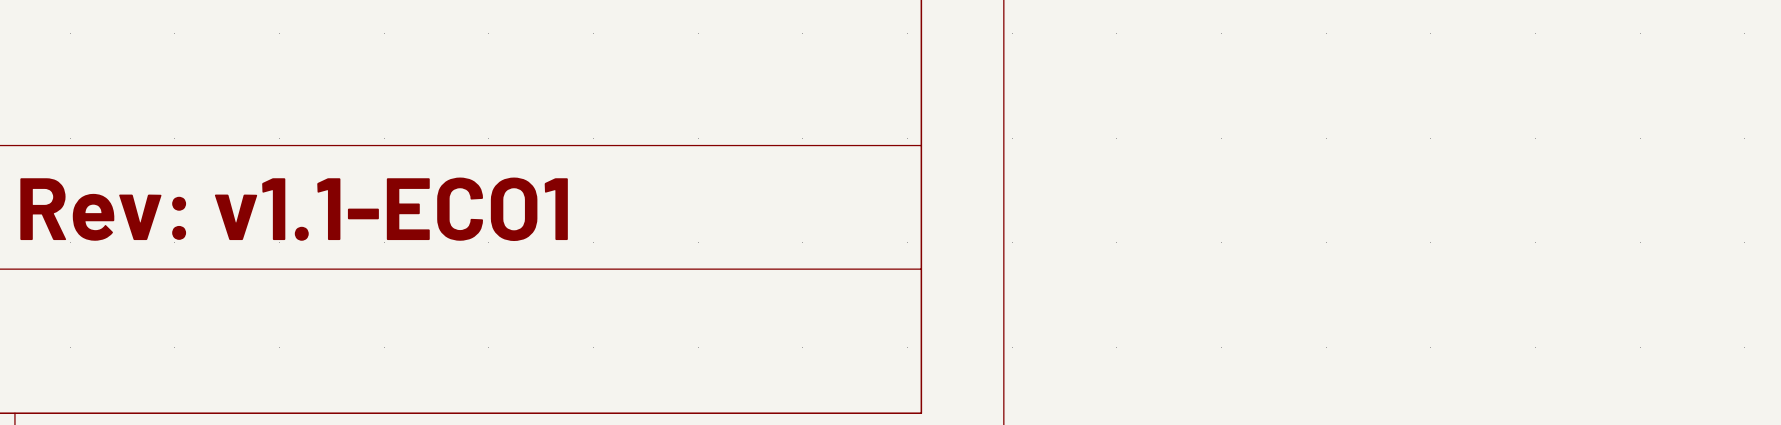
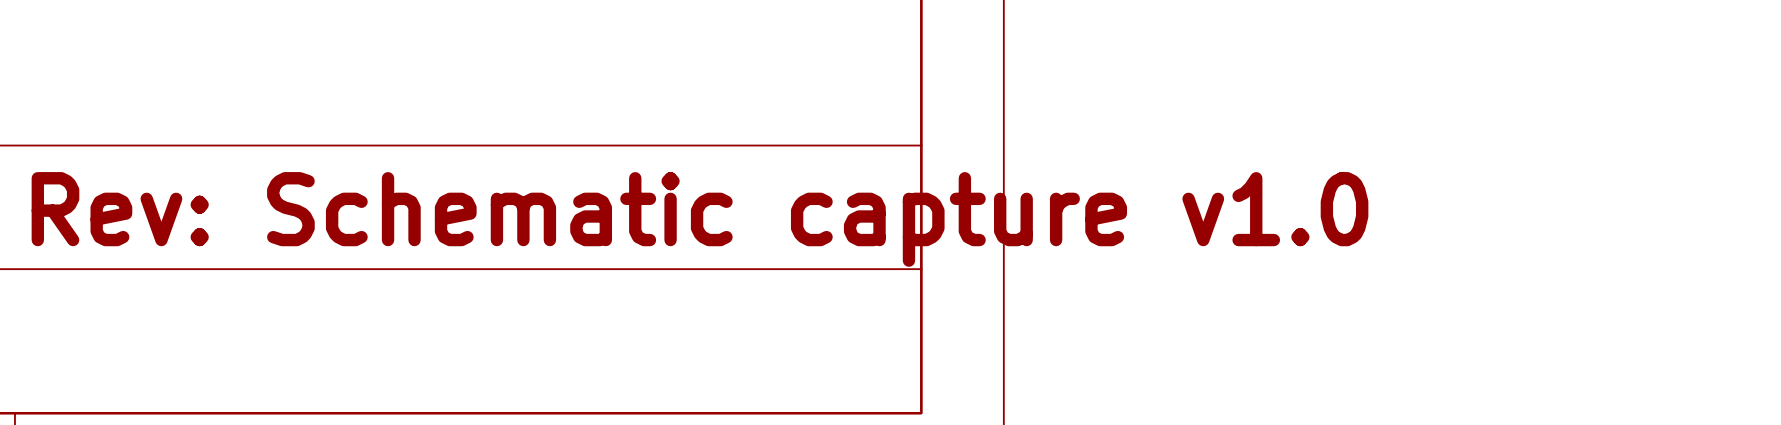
title block: Rev: v1.1-ECO1 (294, 209) -> Rev: Schematic capture v1.0 (700, 219)

